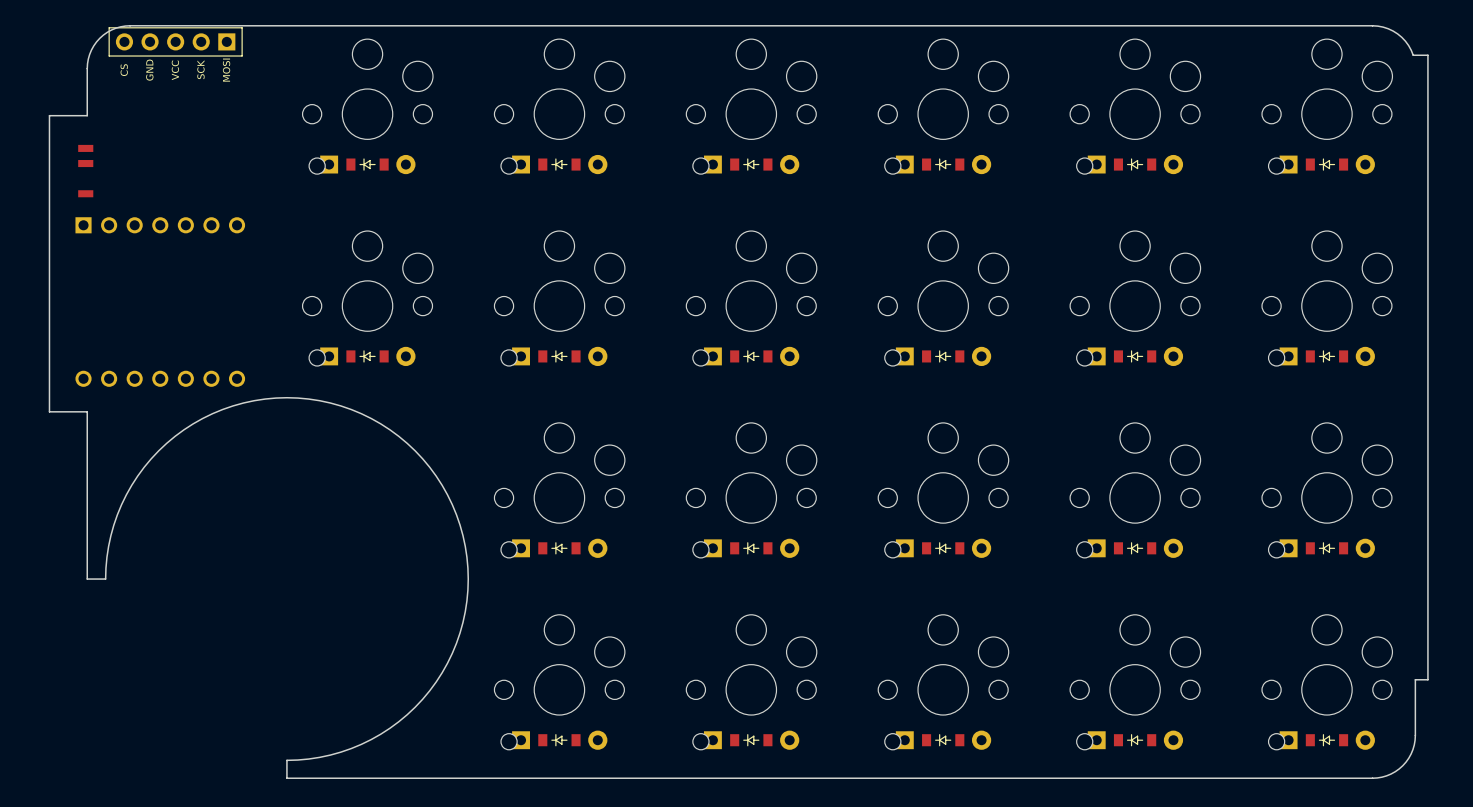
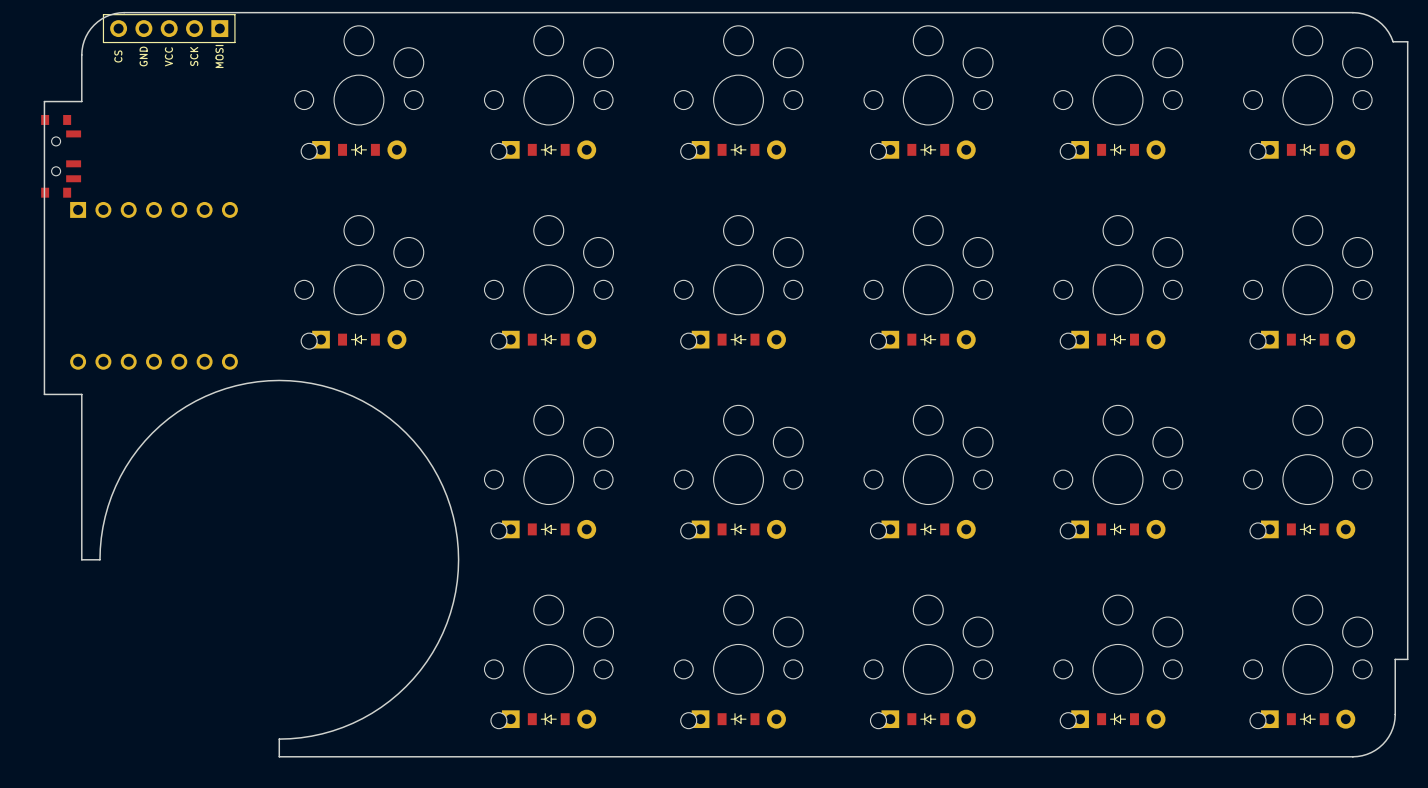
part: none -> (61, 156)
part: (85, 171) -> none

